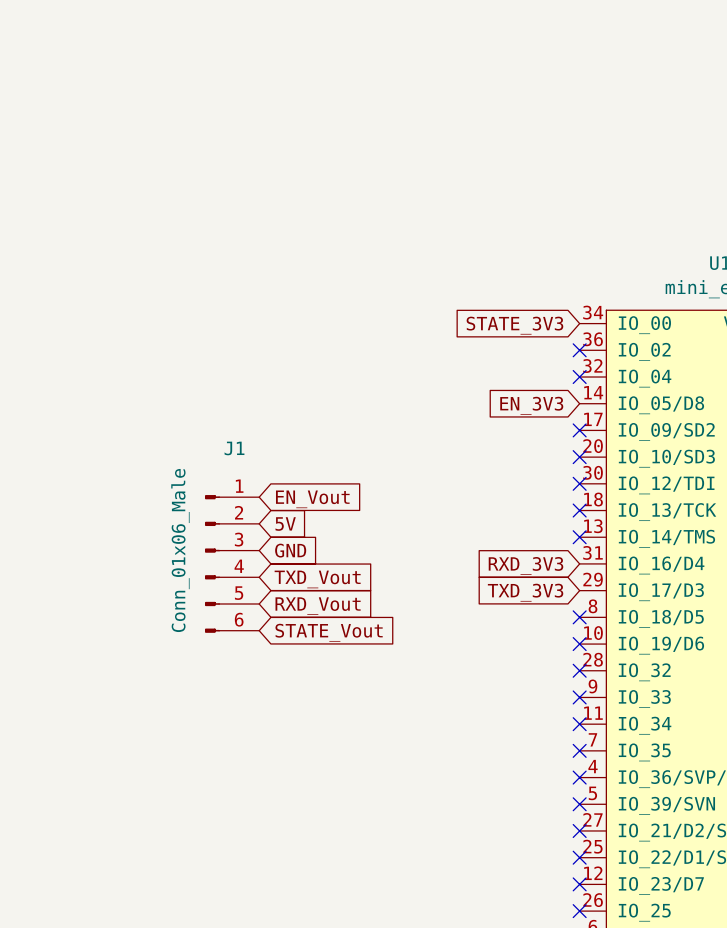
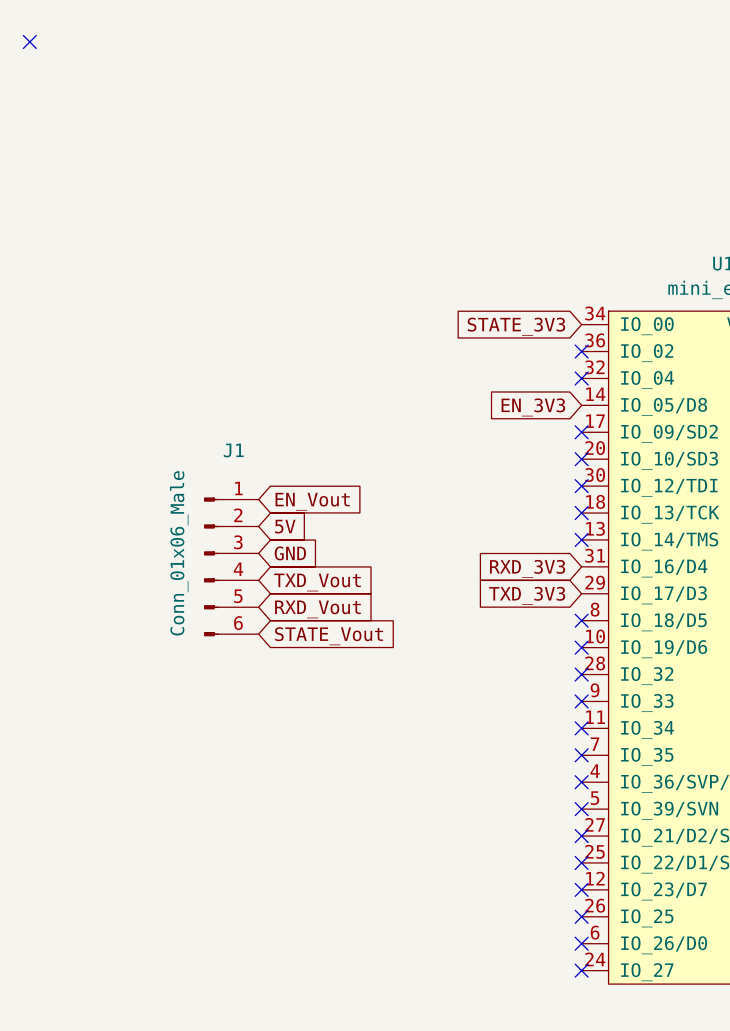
no-connect mark: none -> (29, 41)

